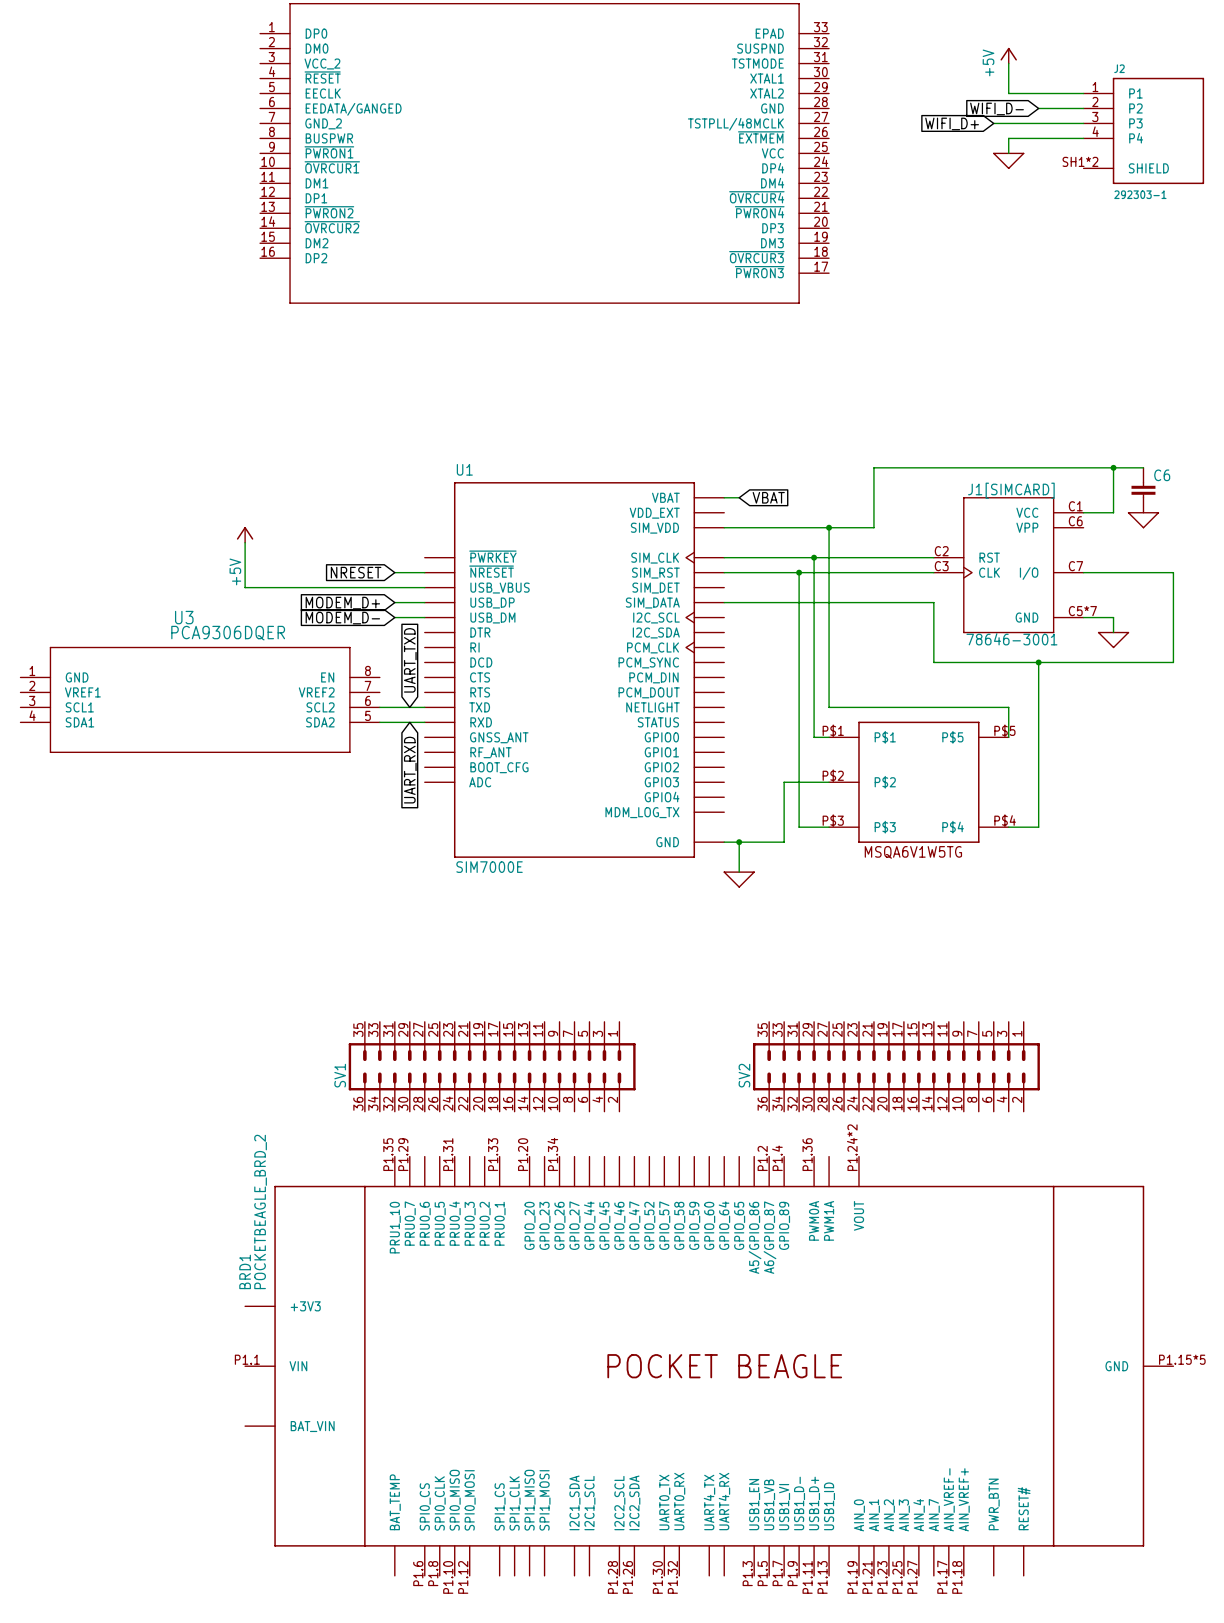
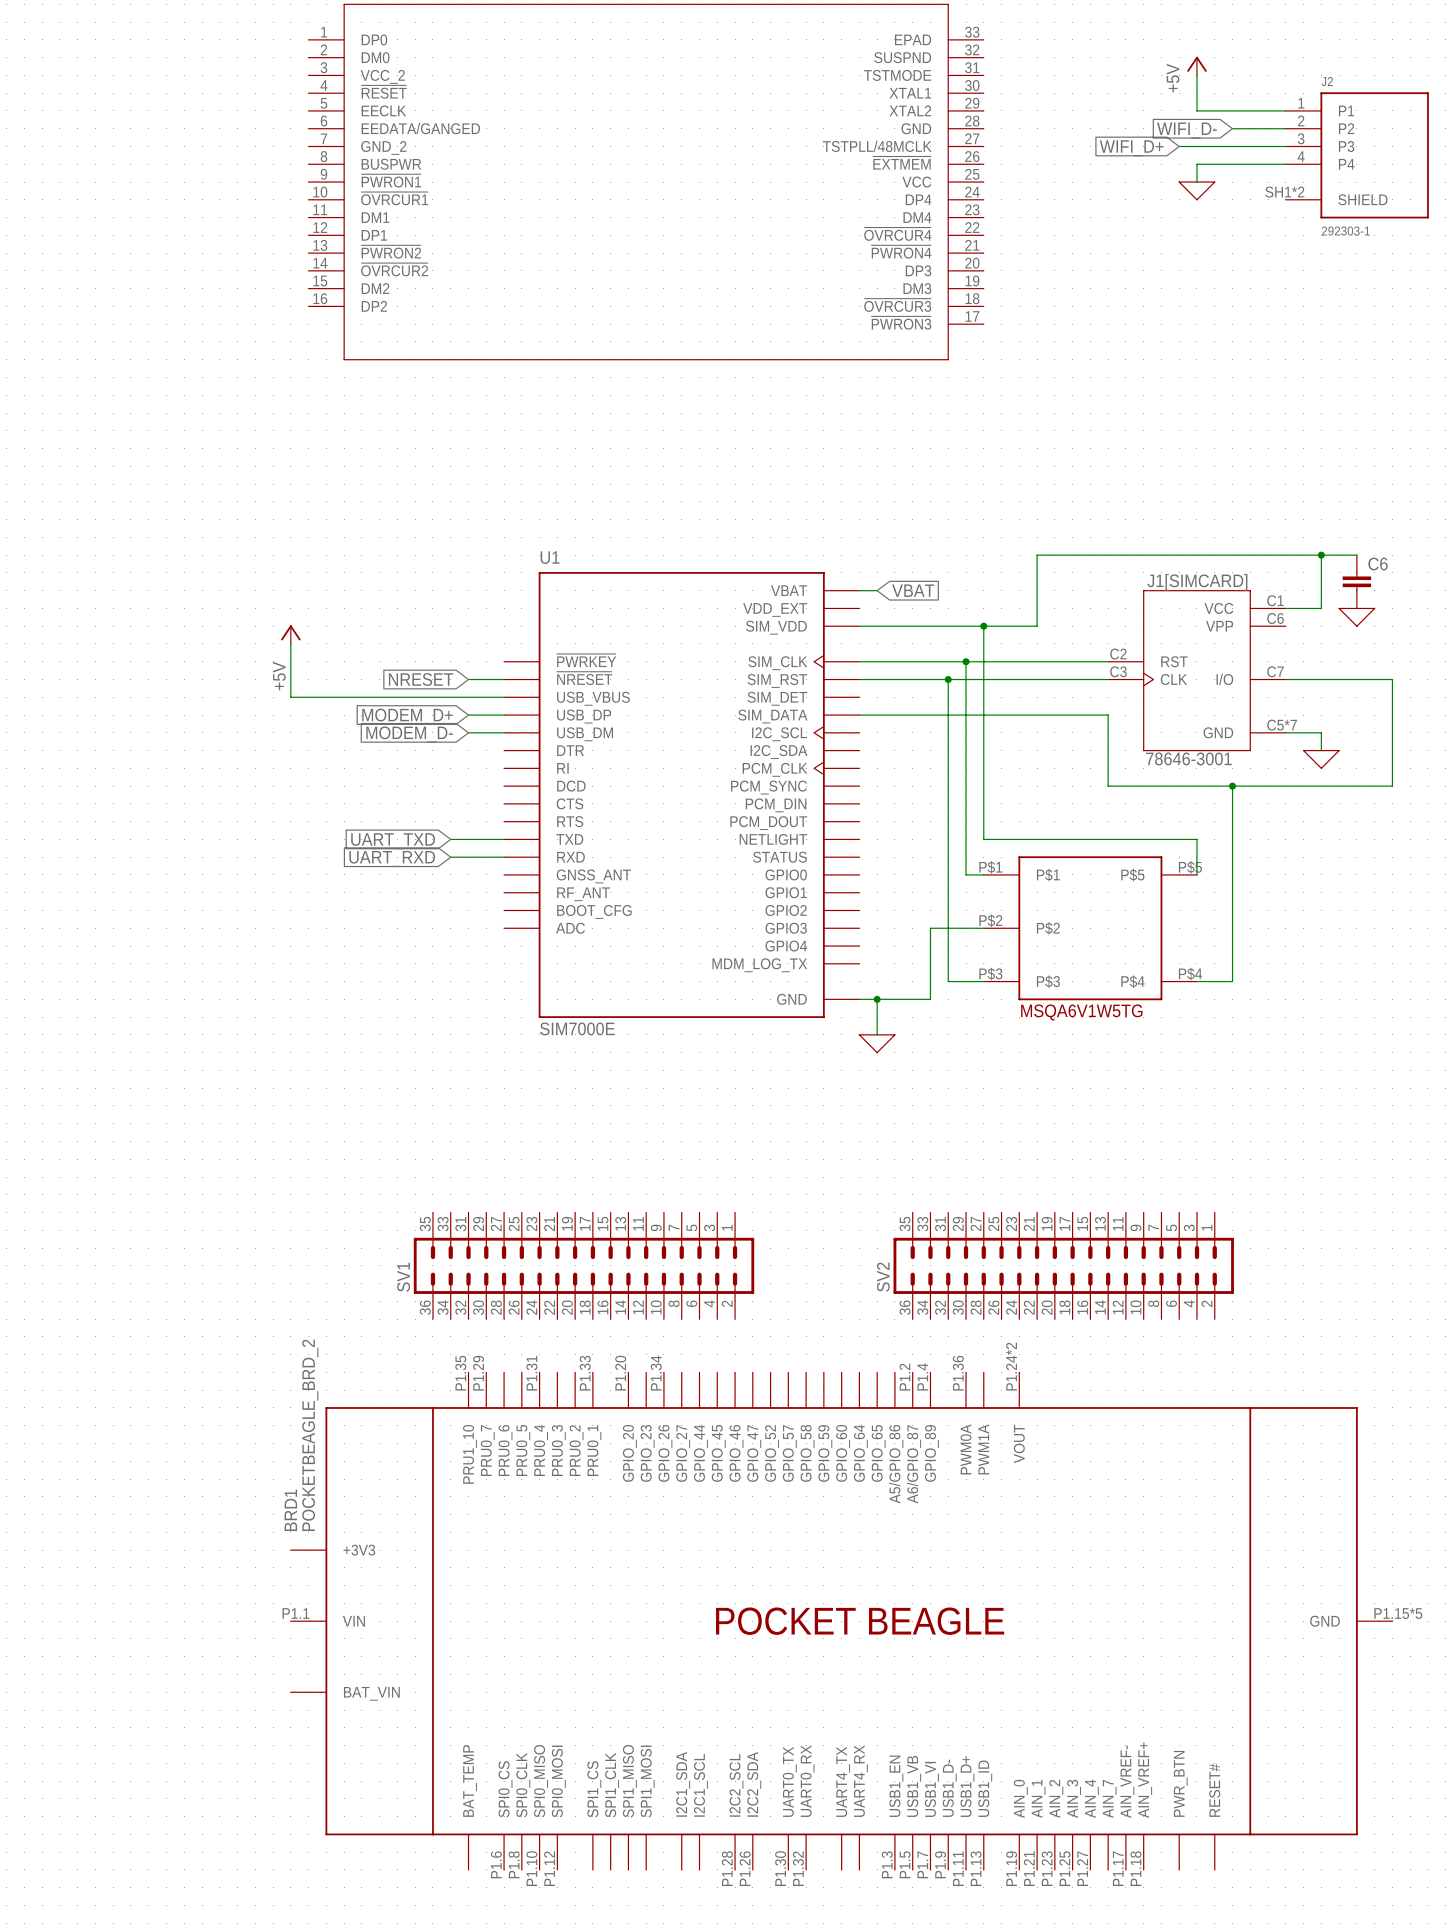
global label rotation: 0° (410, 660) -> 90° counterclockwise (393, 841)
U3: PCA9306DQER (200, 699) -> none
global label rotation: 0° (410, 770) -> 90° clockwise (392, 858)

